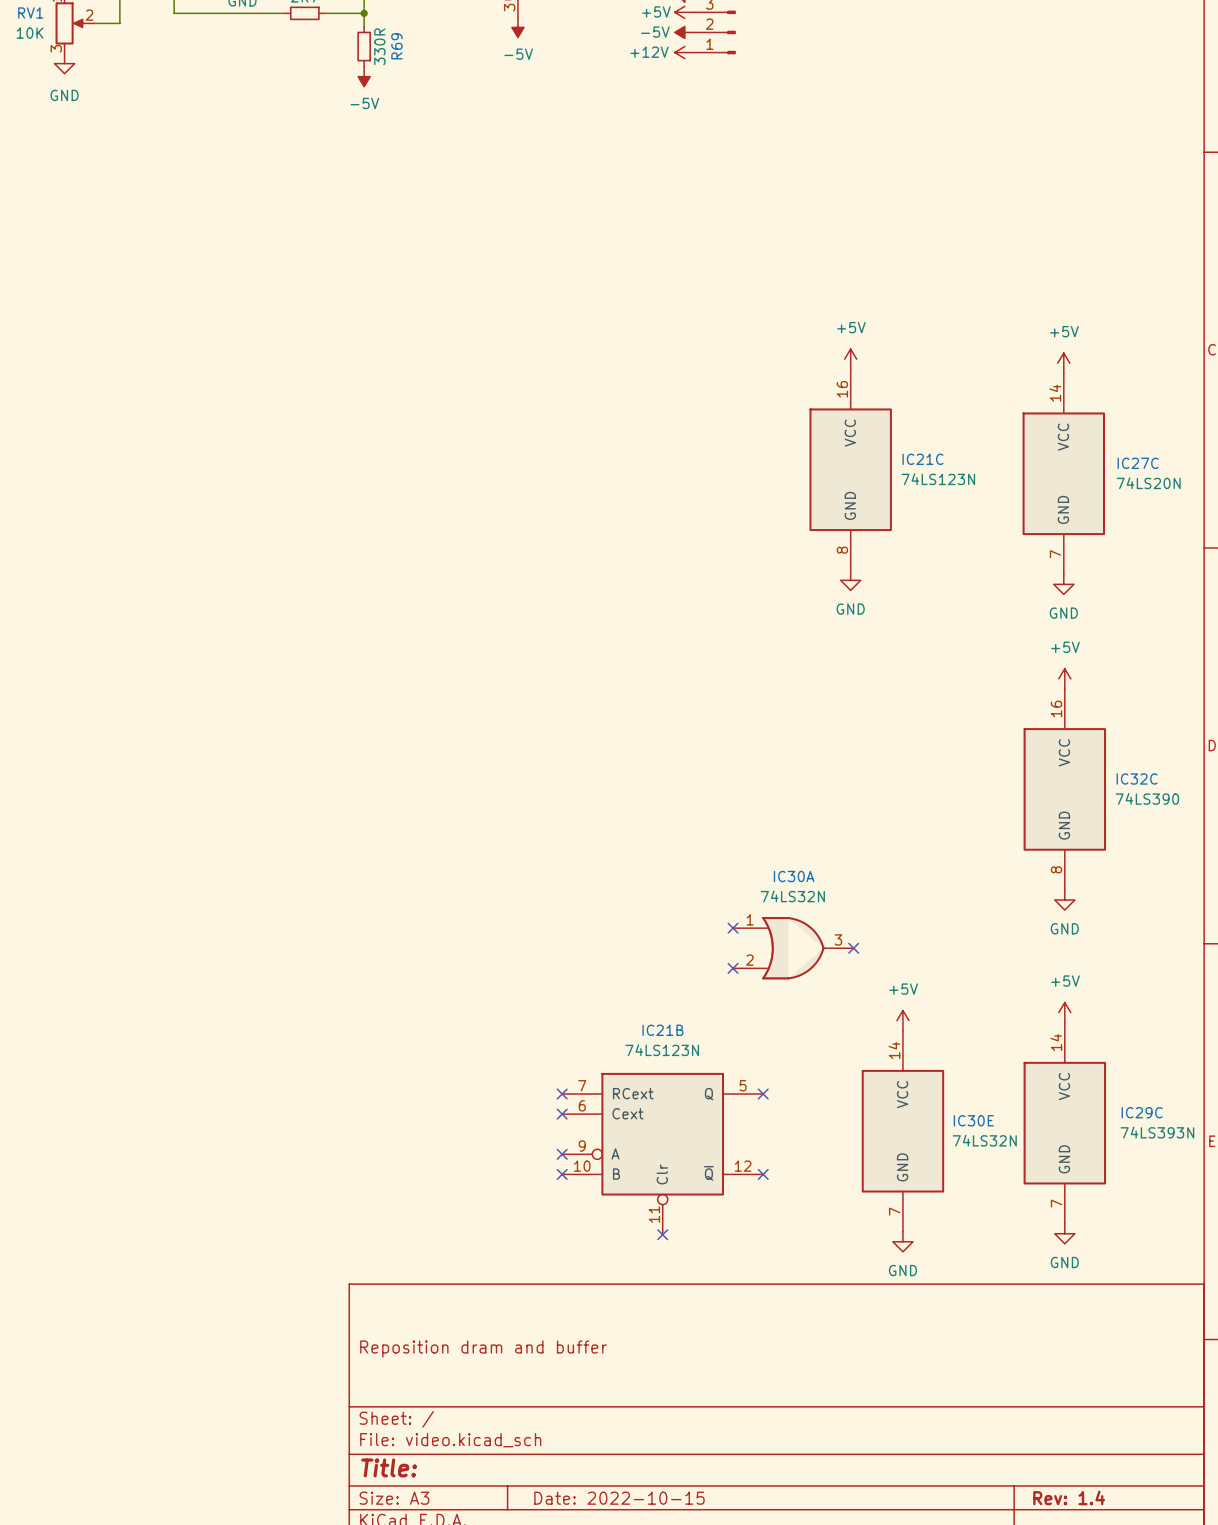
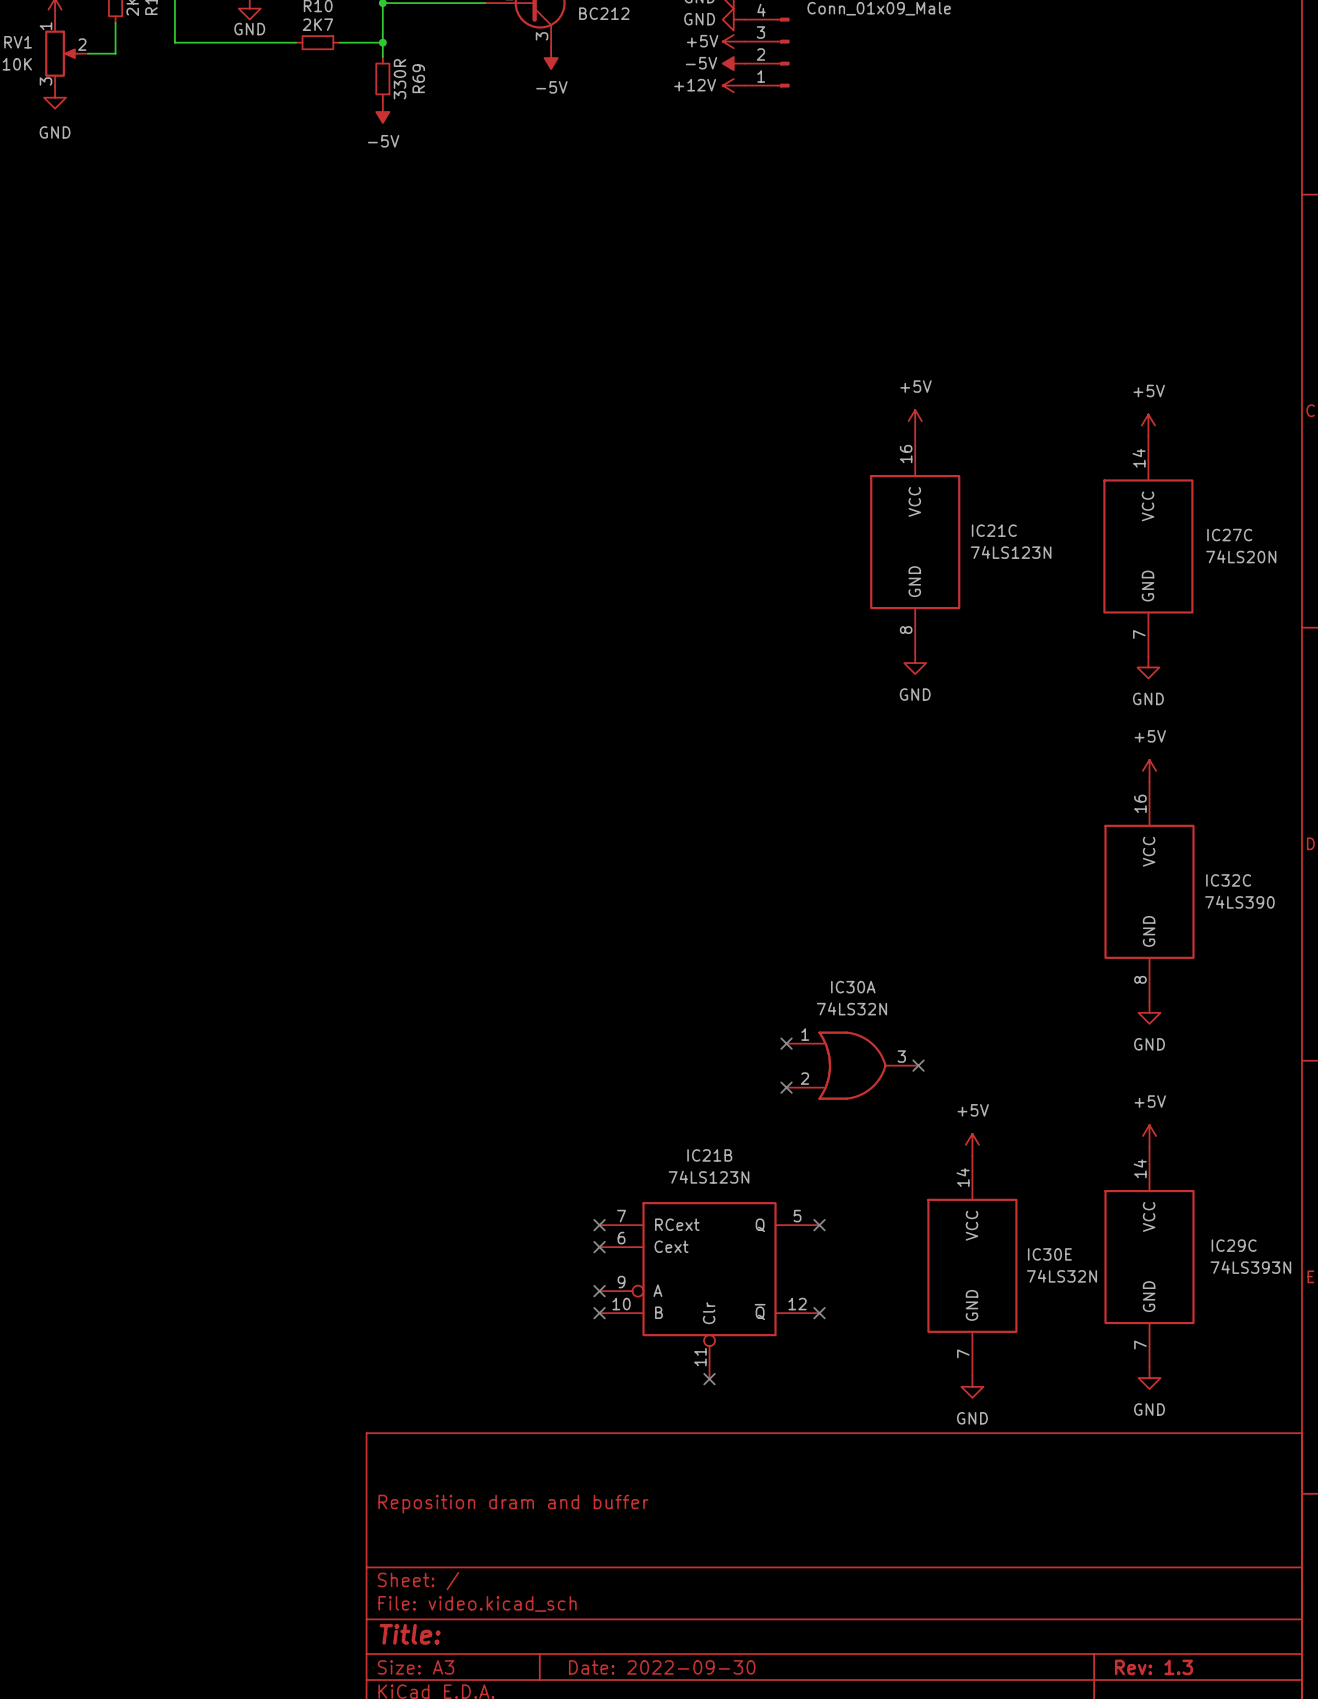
title block: Rev: 1.4 (1069, 1497) -> Rev: 1.3 (1153, 1667)
title block: Date: 2022-10-15 (619, 1498) -> Date: 2022-09-30 (662, 1667)

